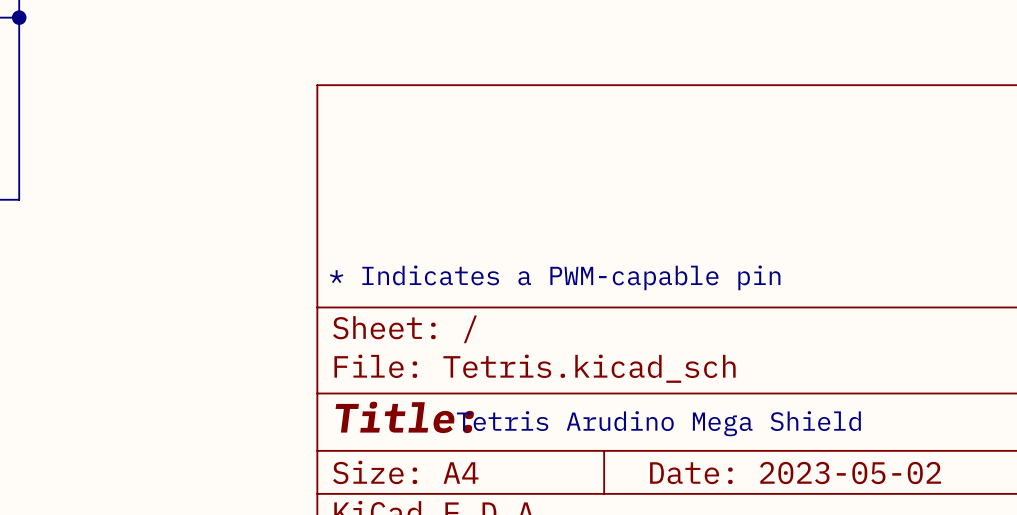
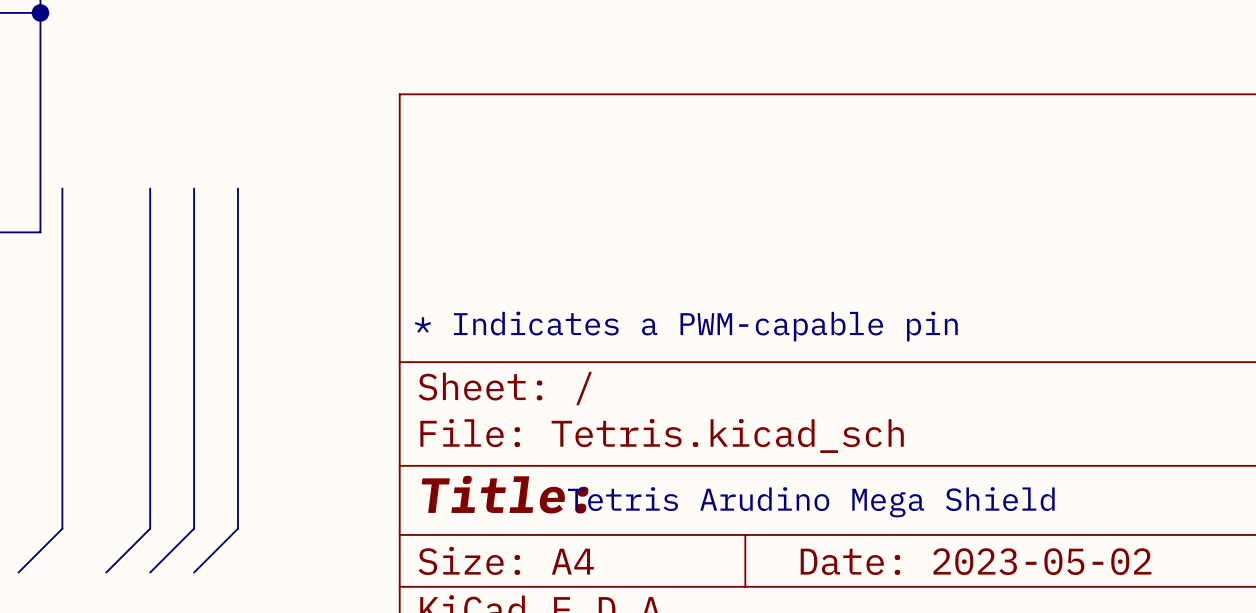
wire: none -> (62, 188) (62, 528) (18, 572)
wire: none -> (150, 188) (150, 528) (106, 572)
wire: none -> (194, 188) (194, 528) (150, 572)
wire: none -> (237, 188) (237, 528) (194, 572)

